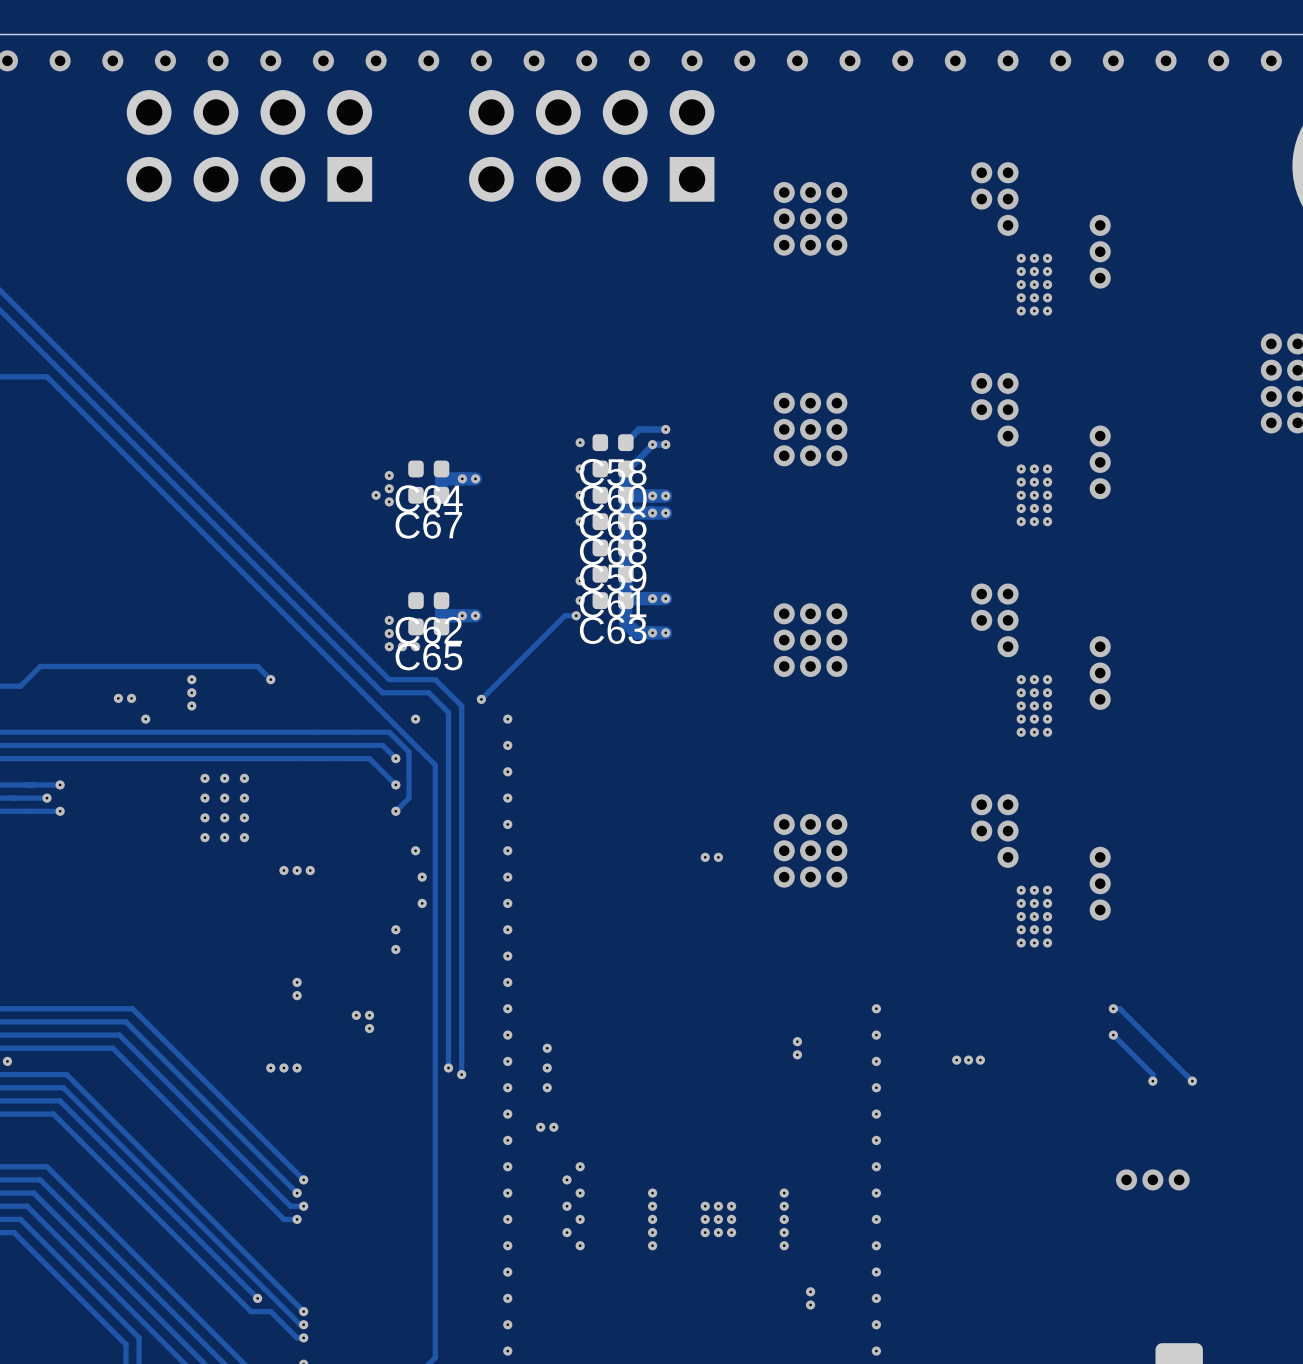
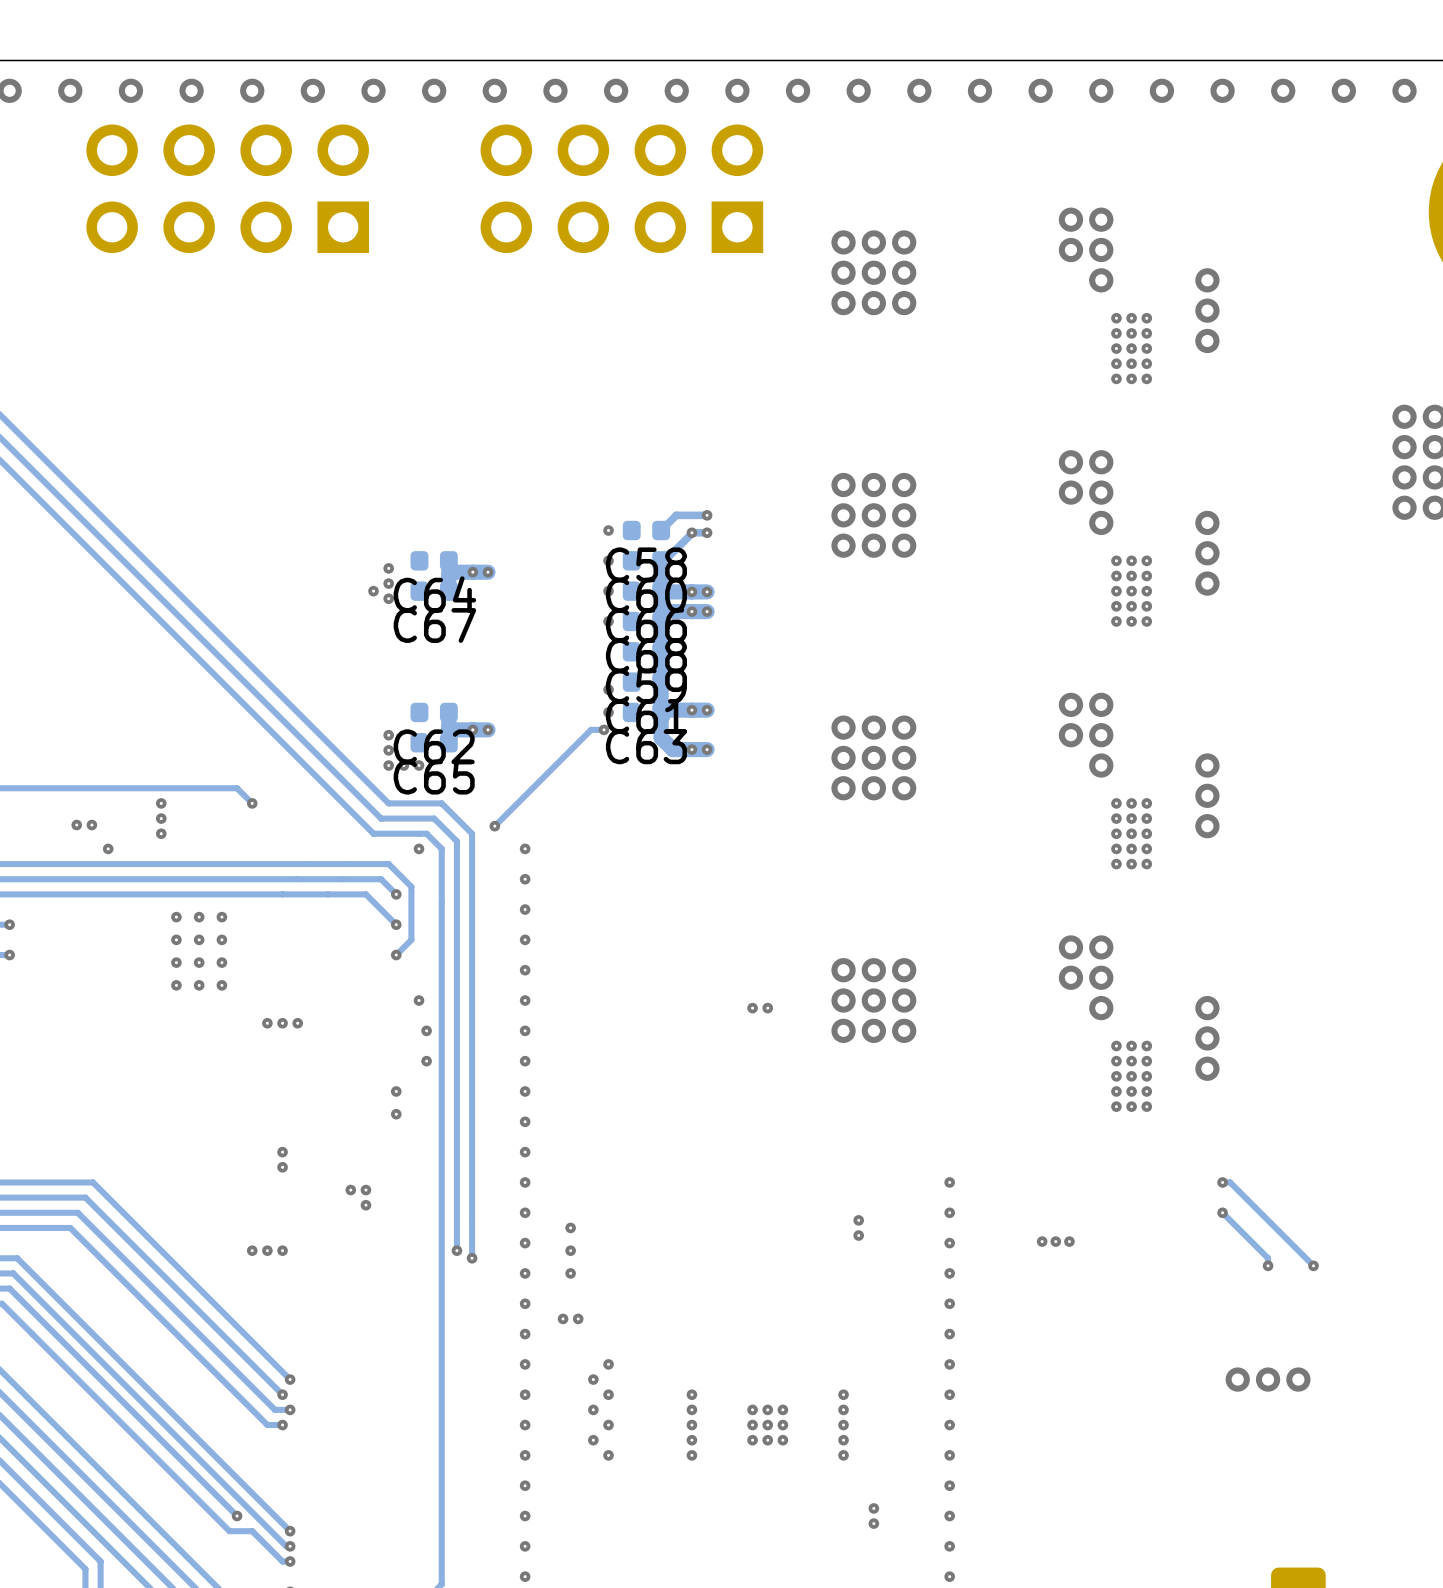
track: (376, 705) (435, 765) -> (373, 833) (426, 833) (441, 848) (441, 901)

